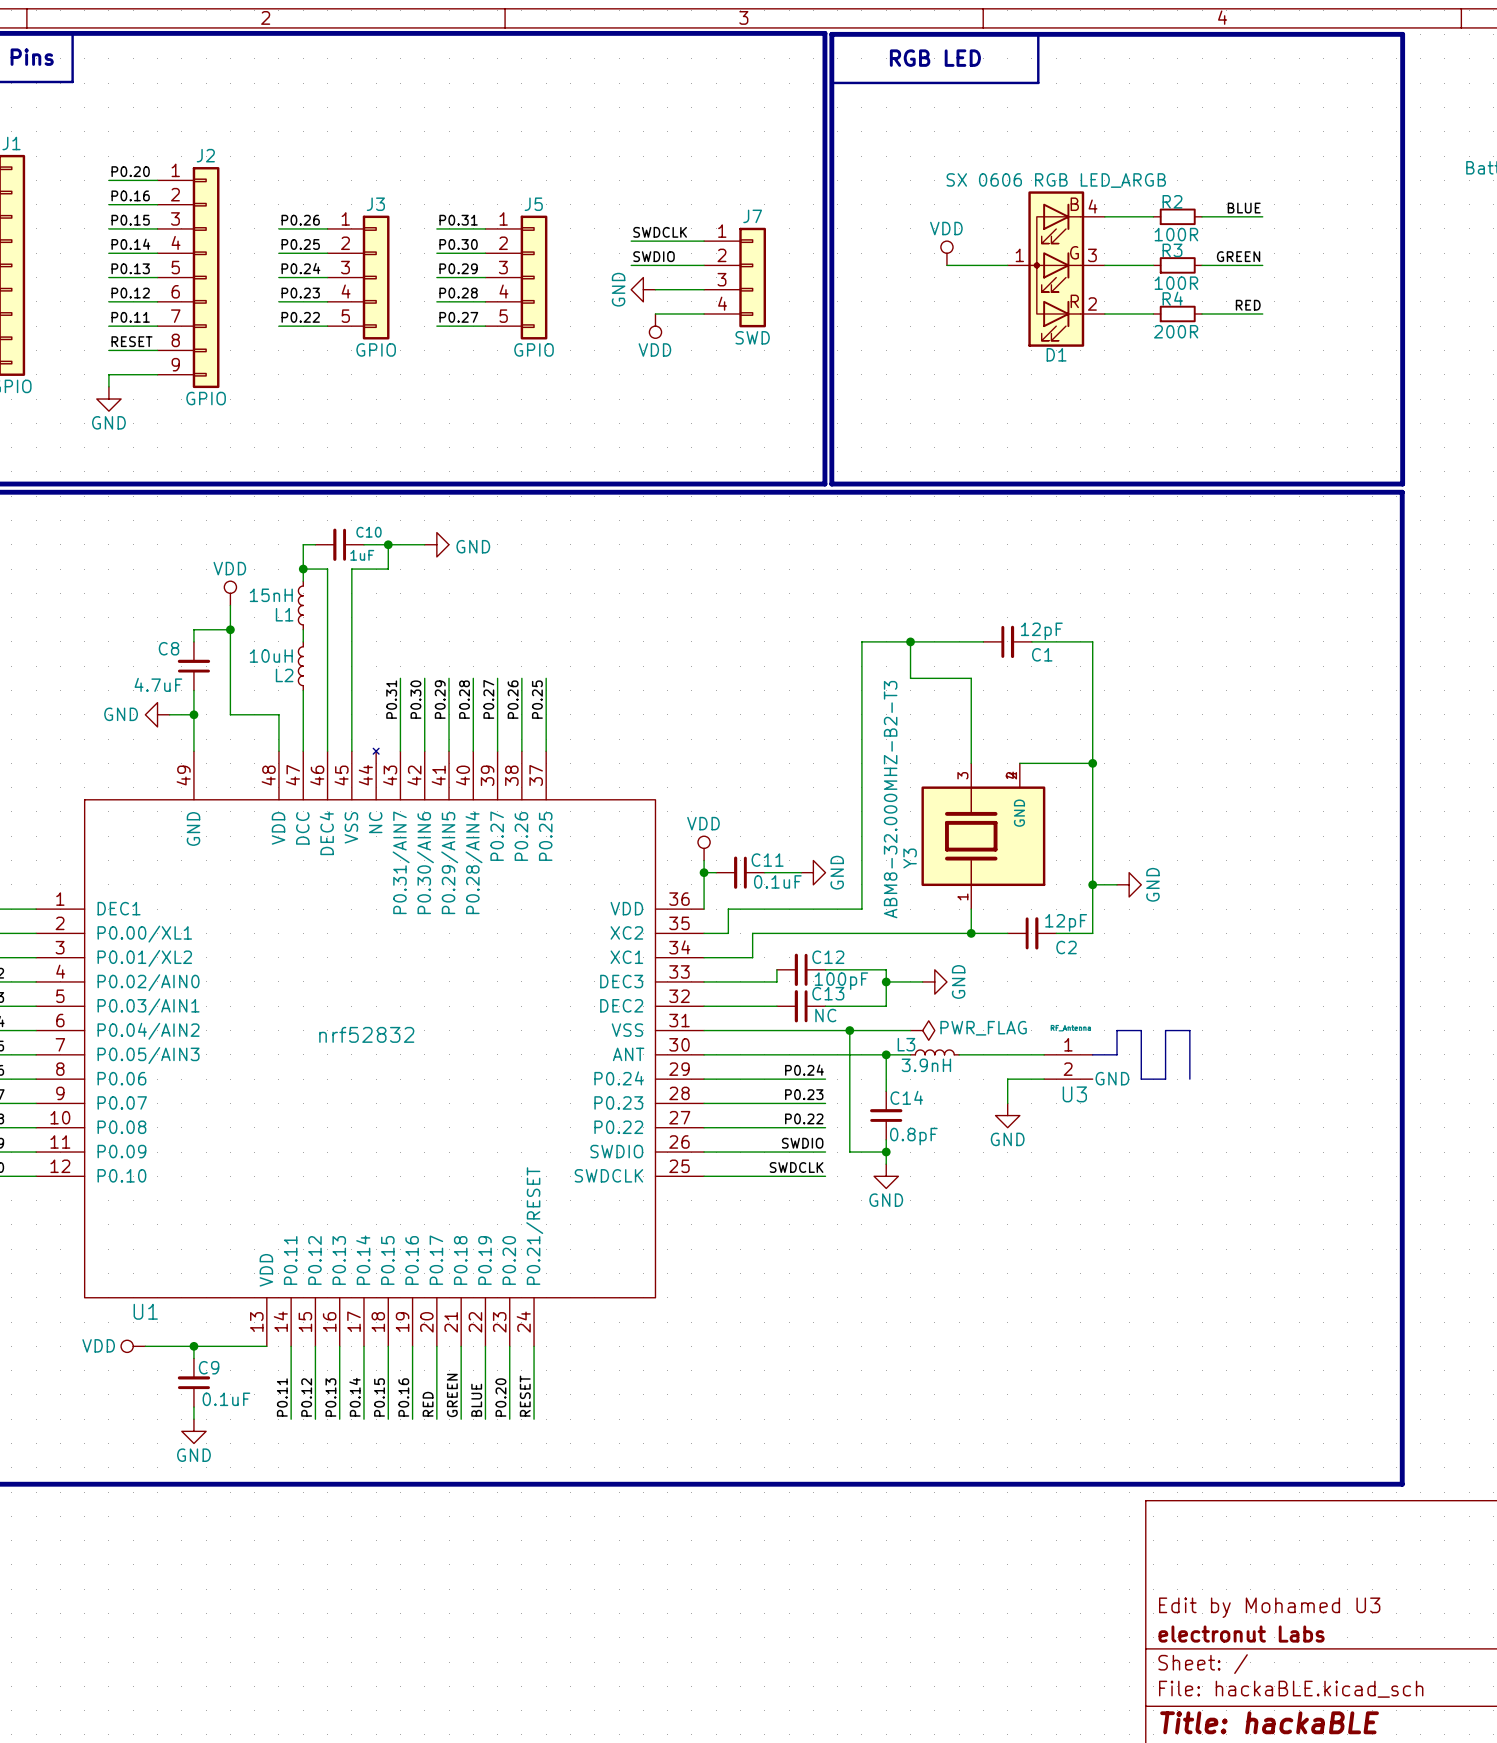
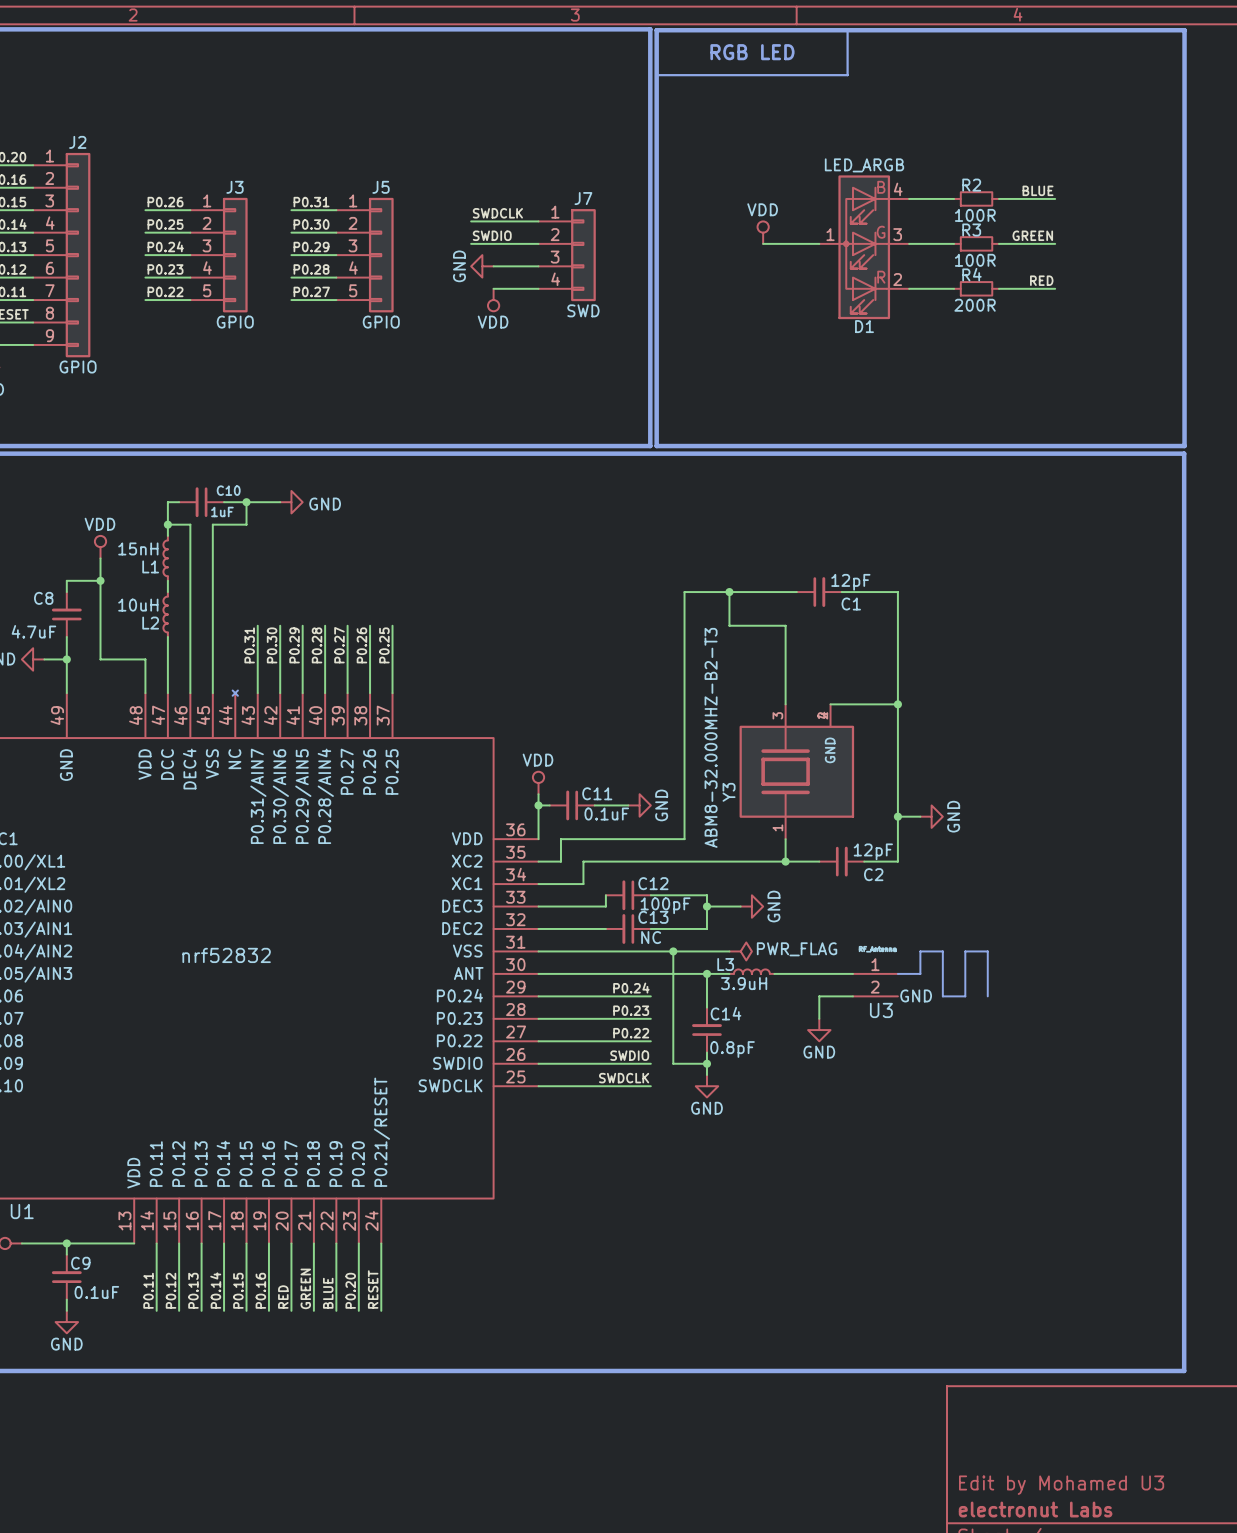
D1 value: SX 0606 RGB LED_ARGB (1056, 180) -> LED_ARGB (864, 165)
L3 value: 3.9nH (926, 1065) -> 3.9uH (744, 983)

